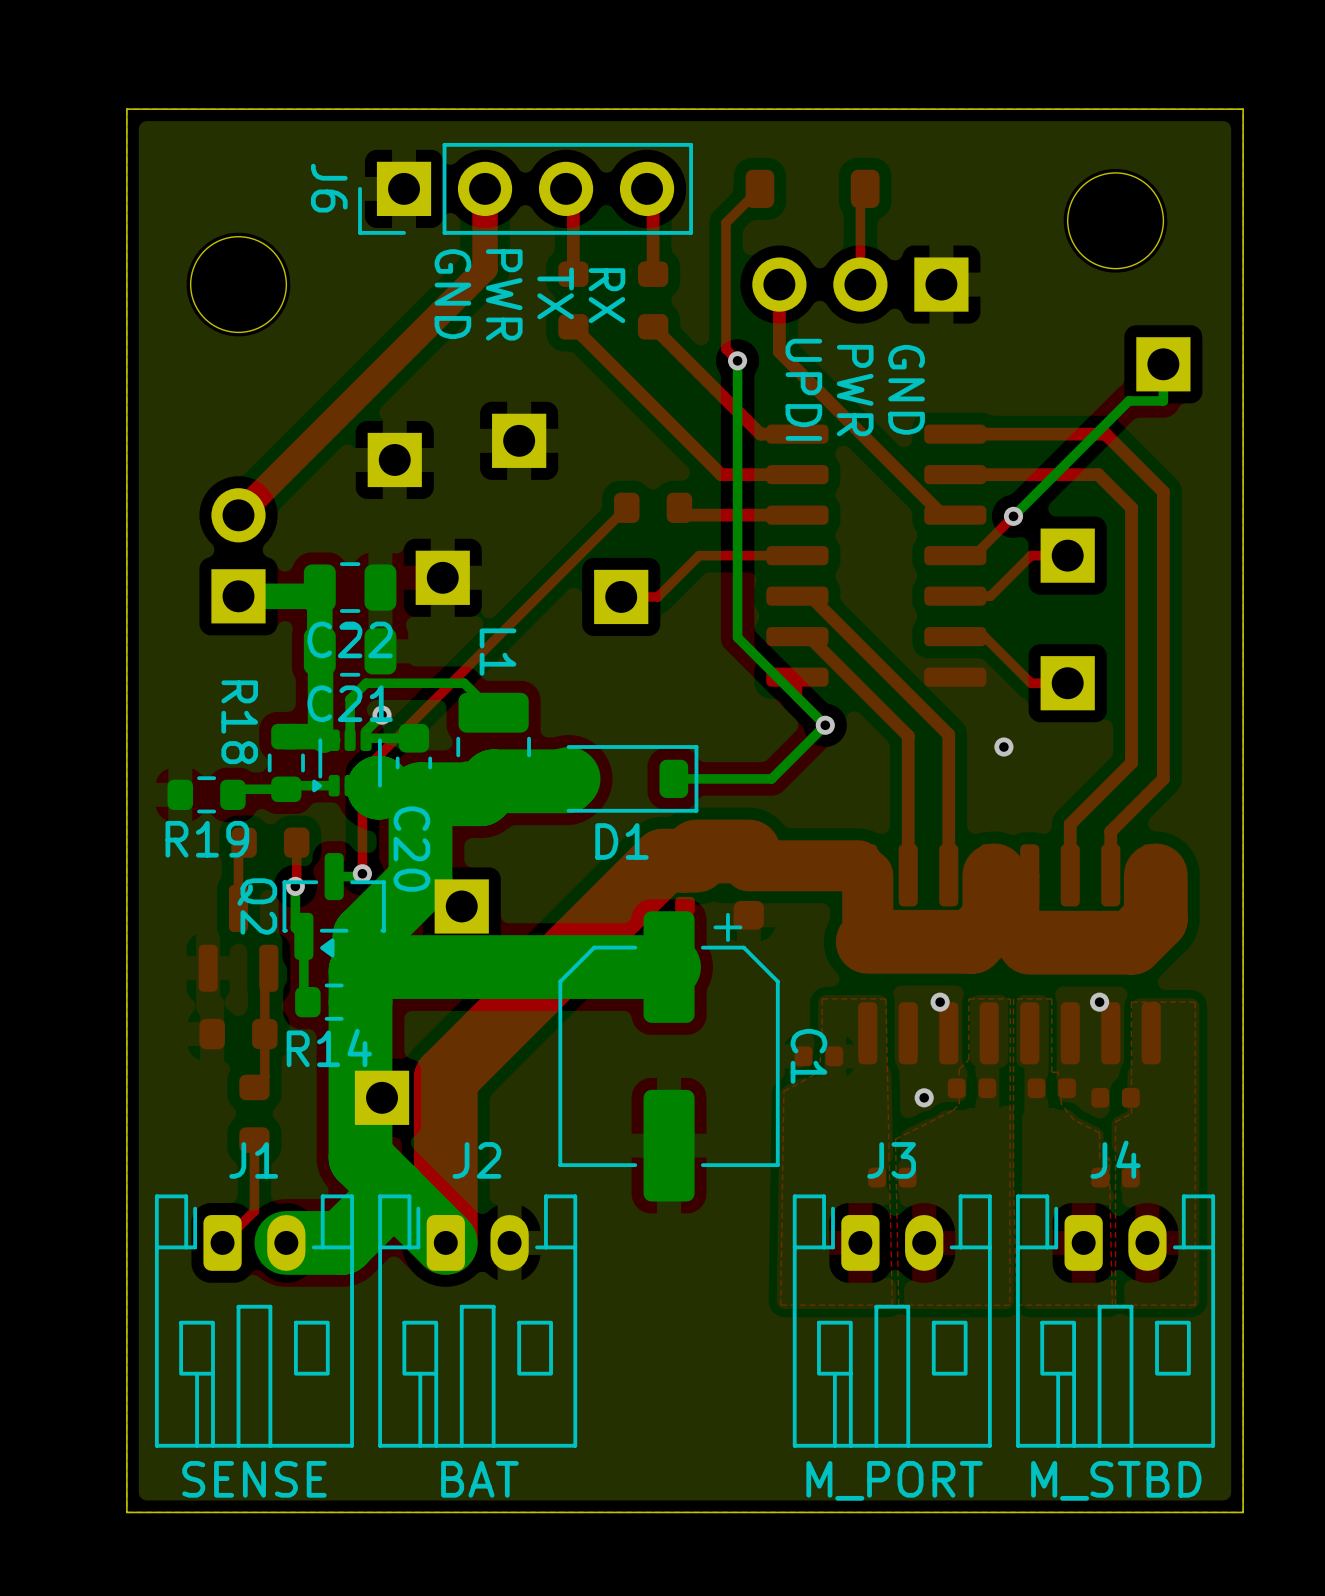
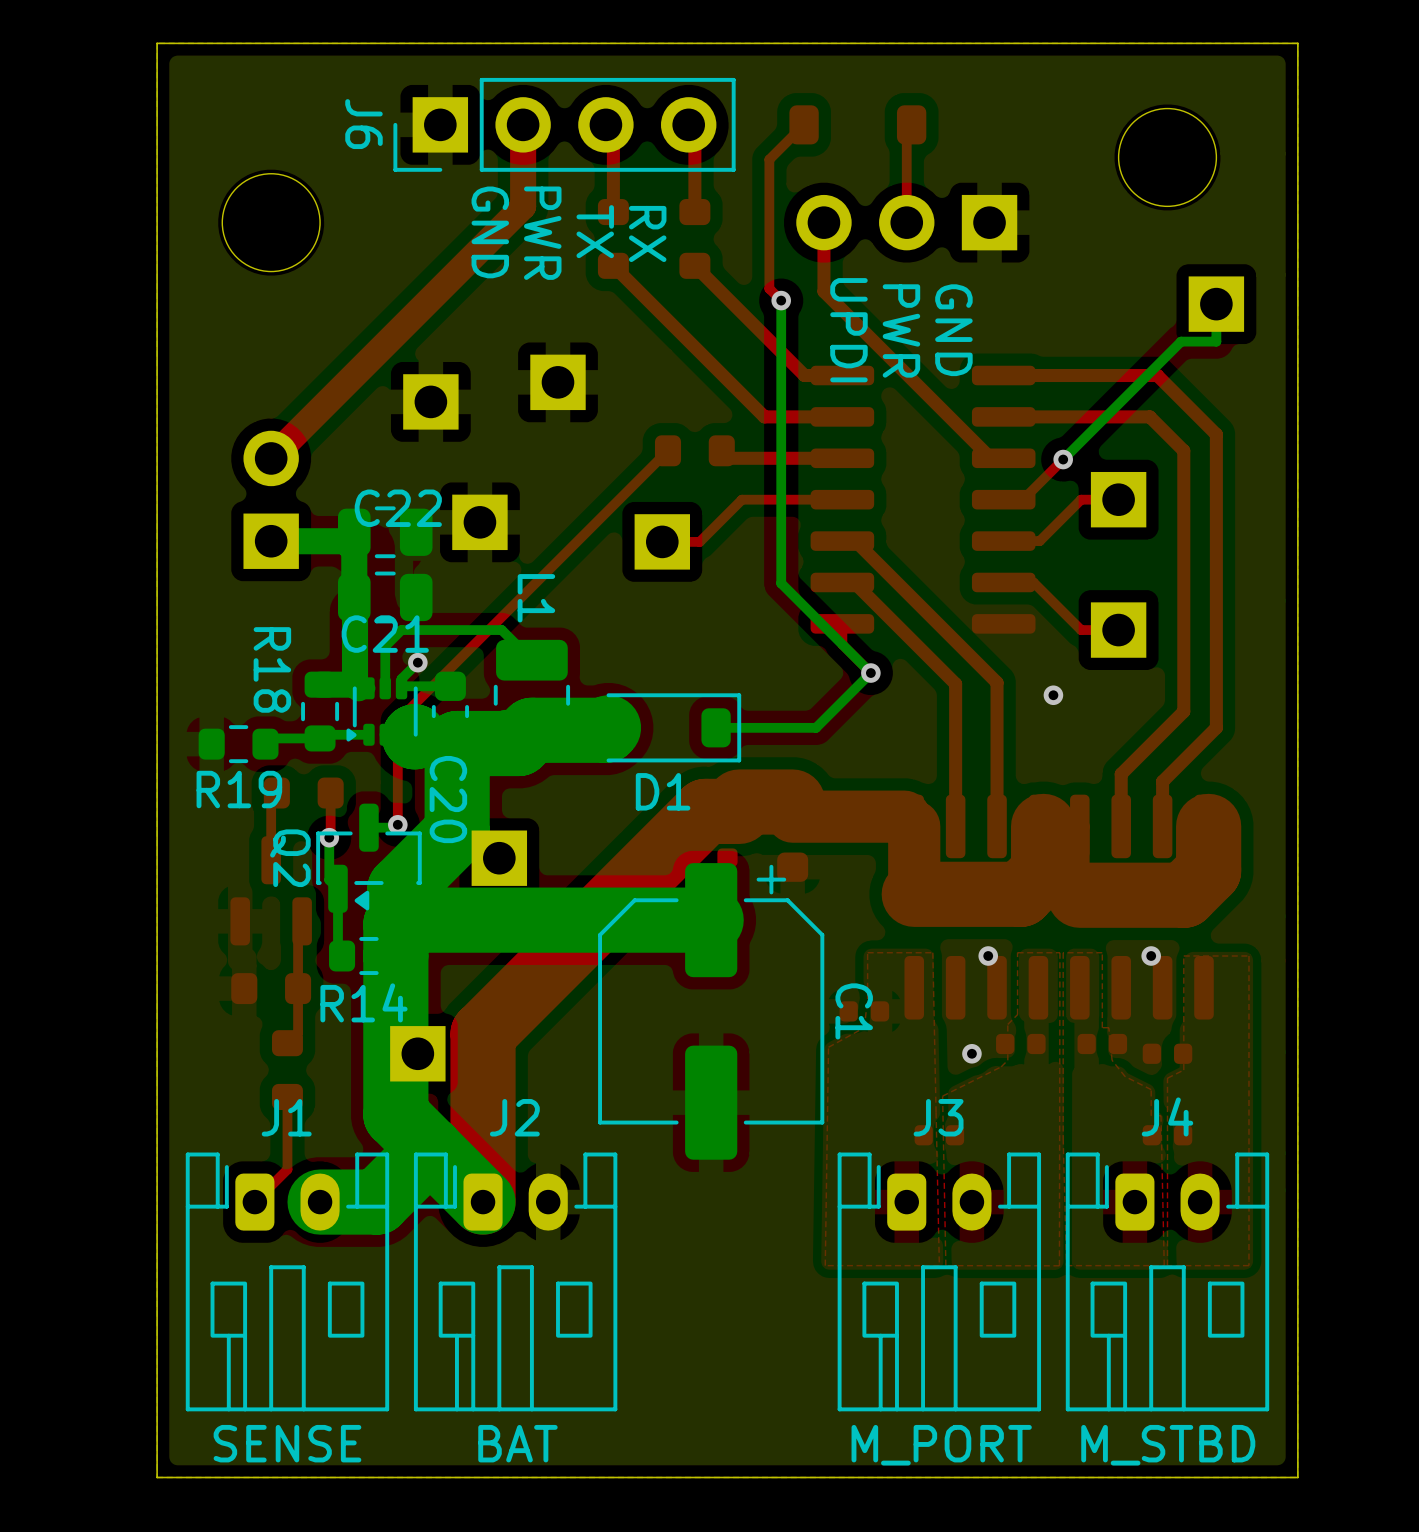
C22 name position: C22 (350, 639) -> C22 (398, 508)
C21 name position: C21 (350, 703) -> C21 (385, 634)

